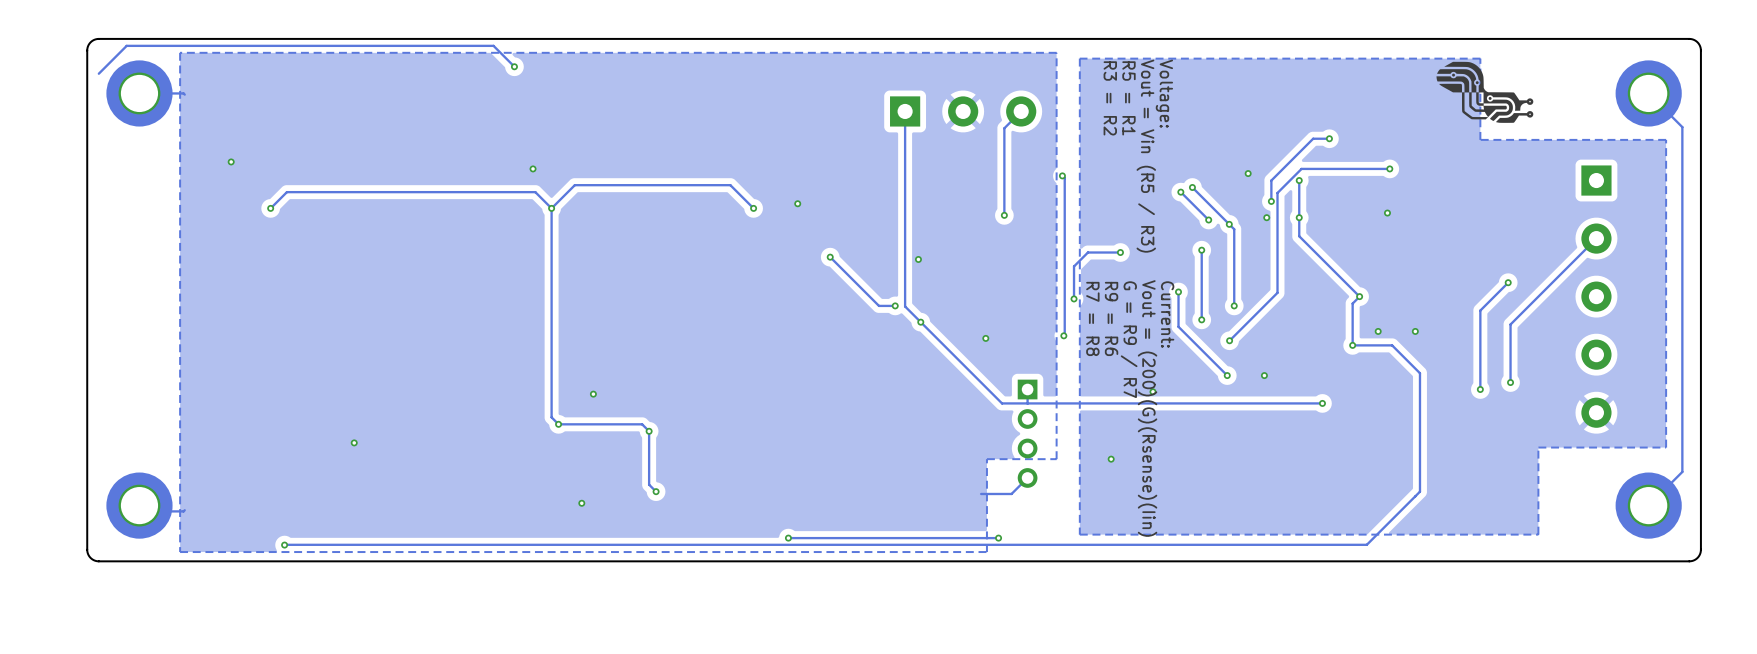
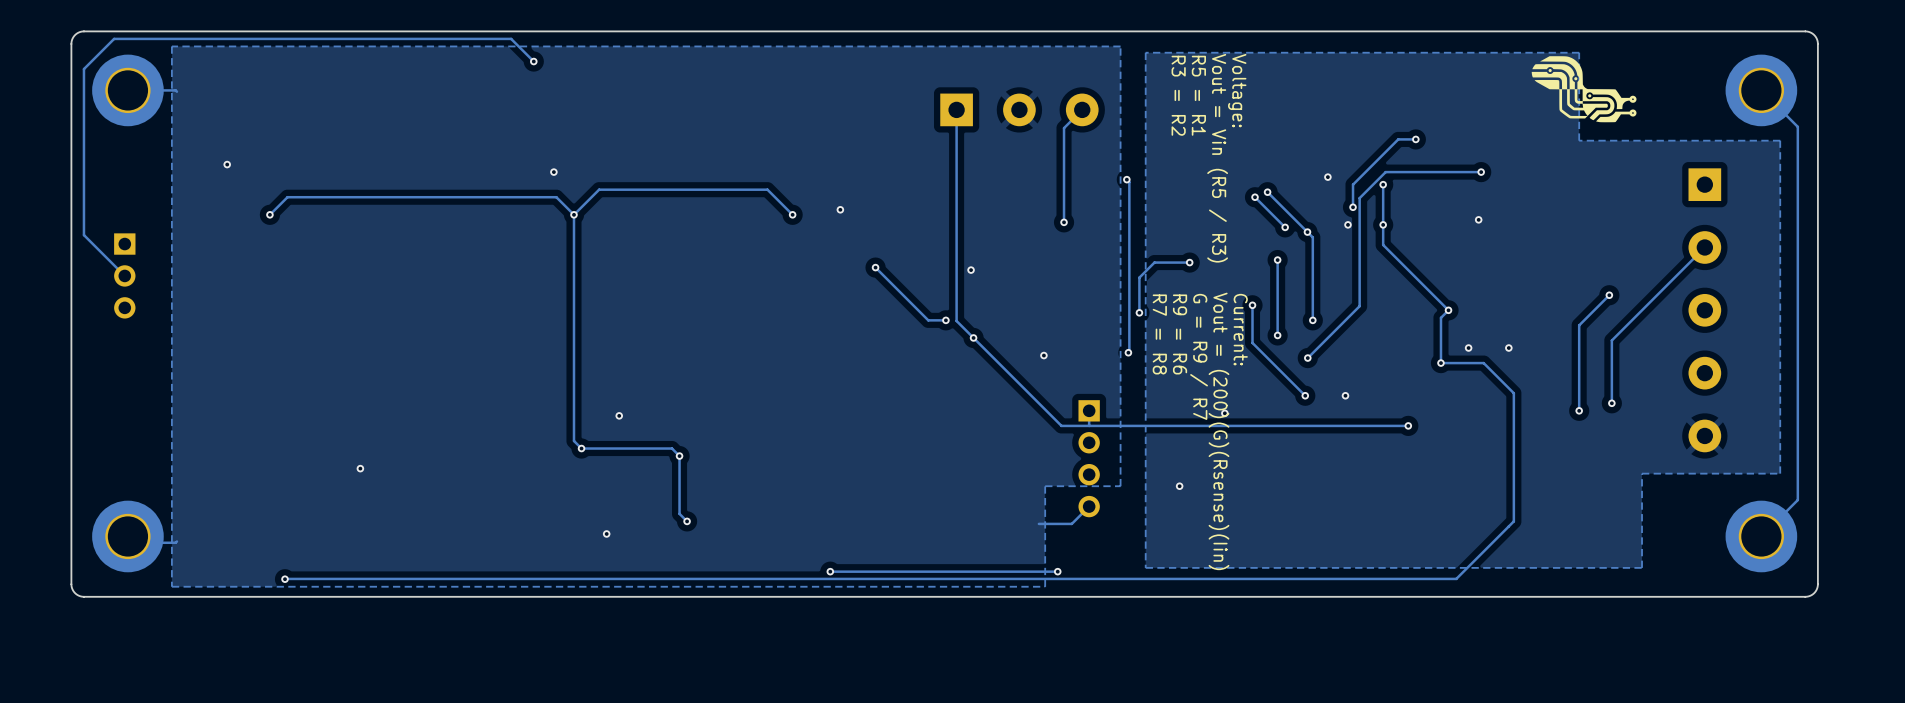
track: none -> (83, 69) (83, 235) (124, 275)
part: none -> (124, 275)

